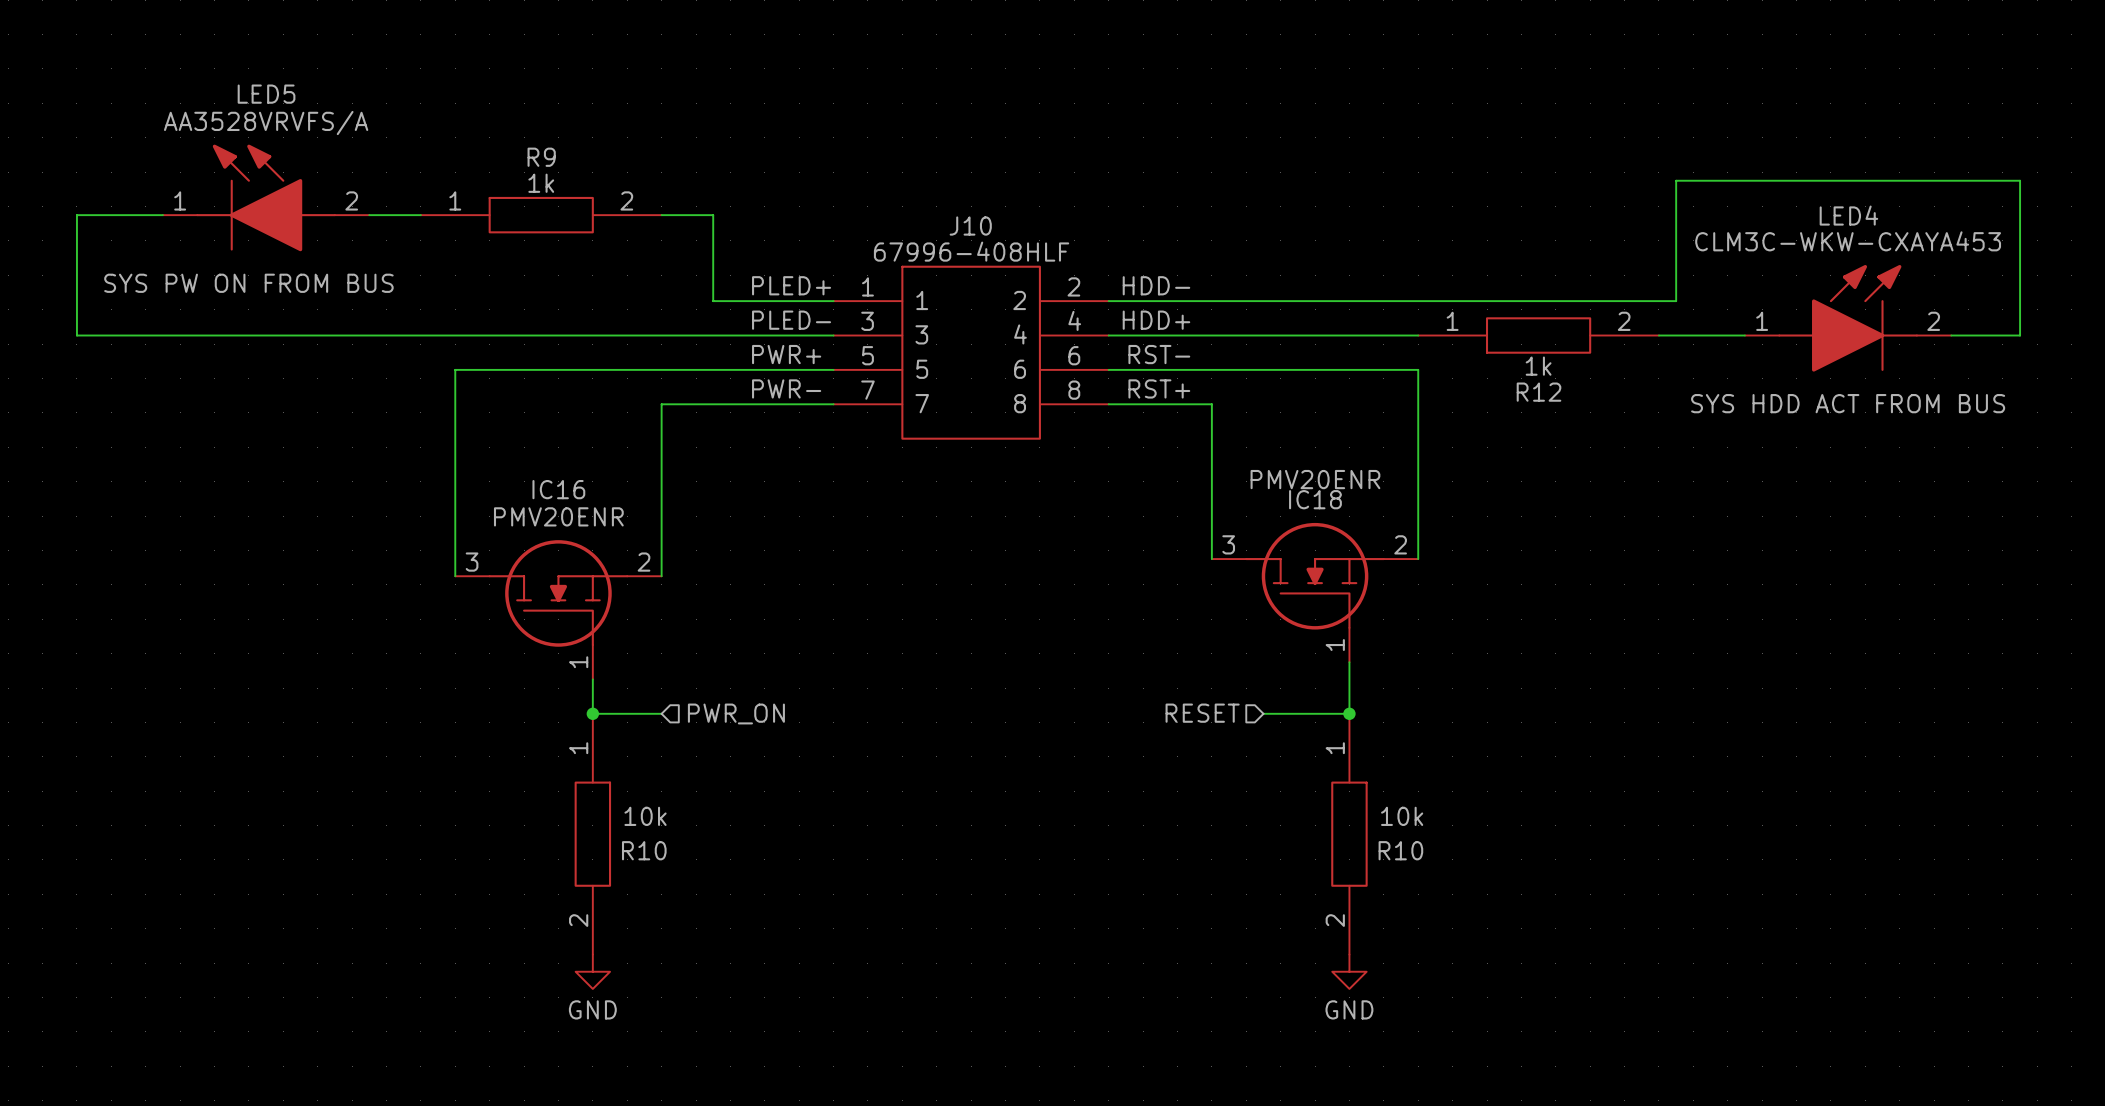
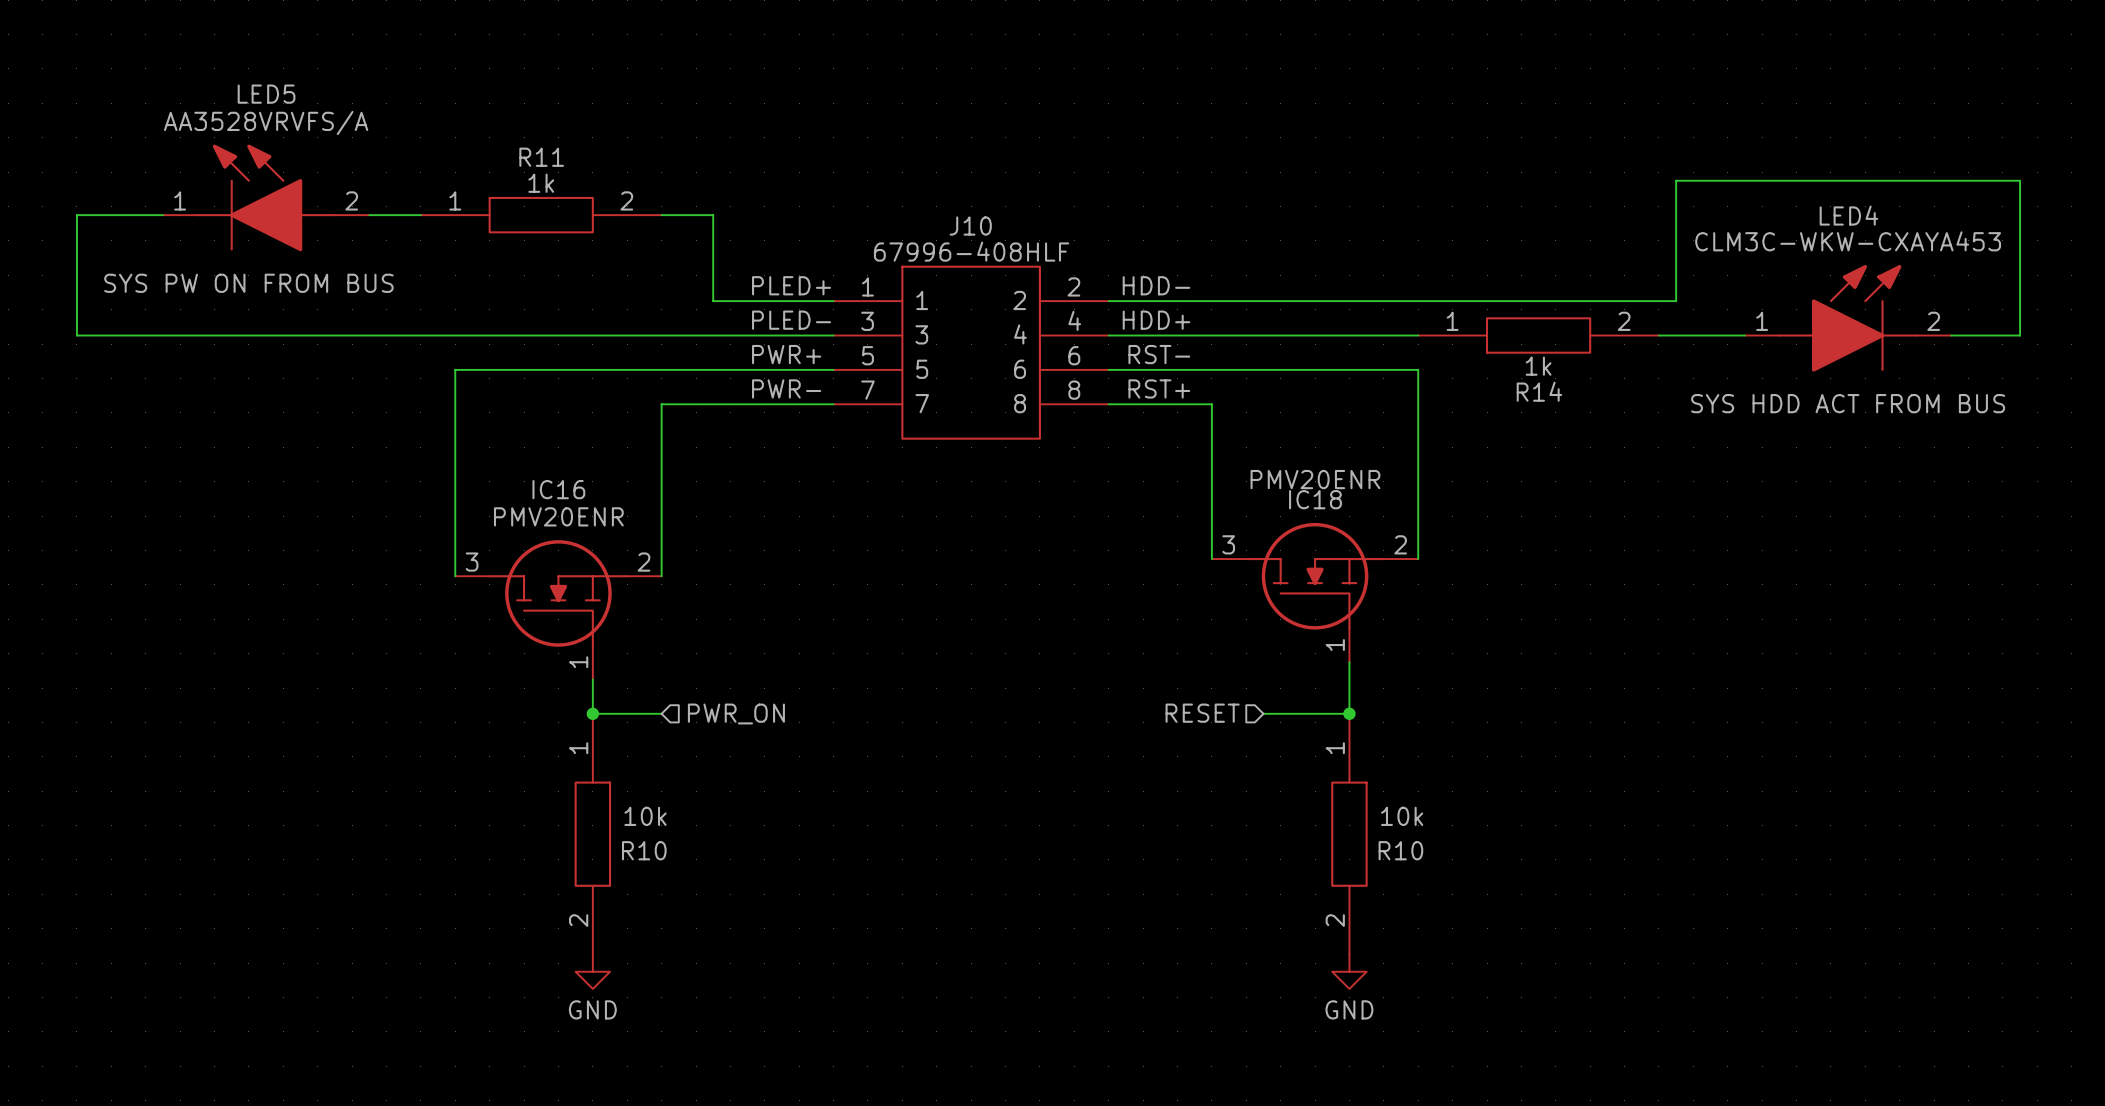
R9 name: R9 (541, 157) -> R11 (541, 157)
R12 name: R12 (1539, 392) -> R14 (1539, 391)

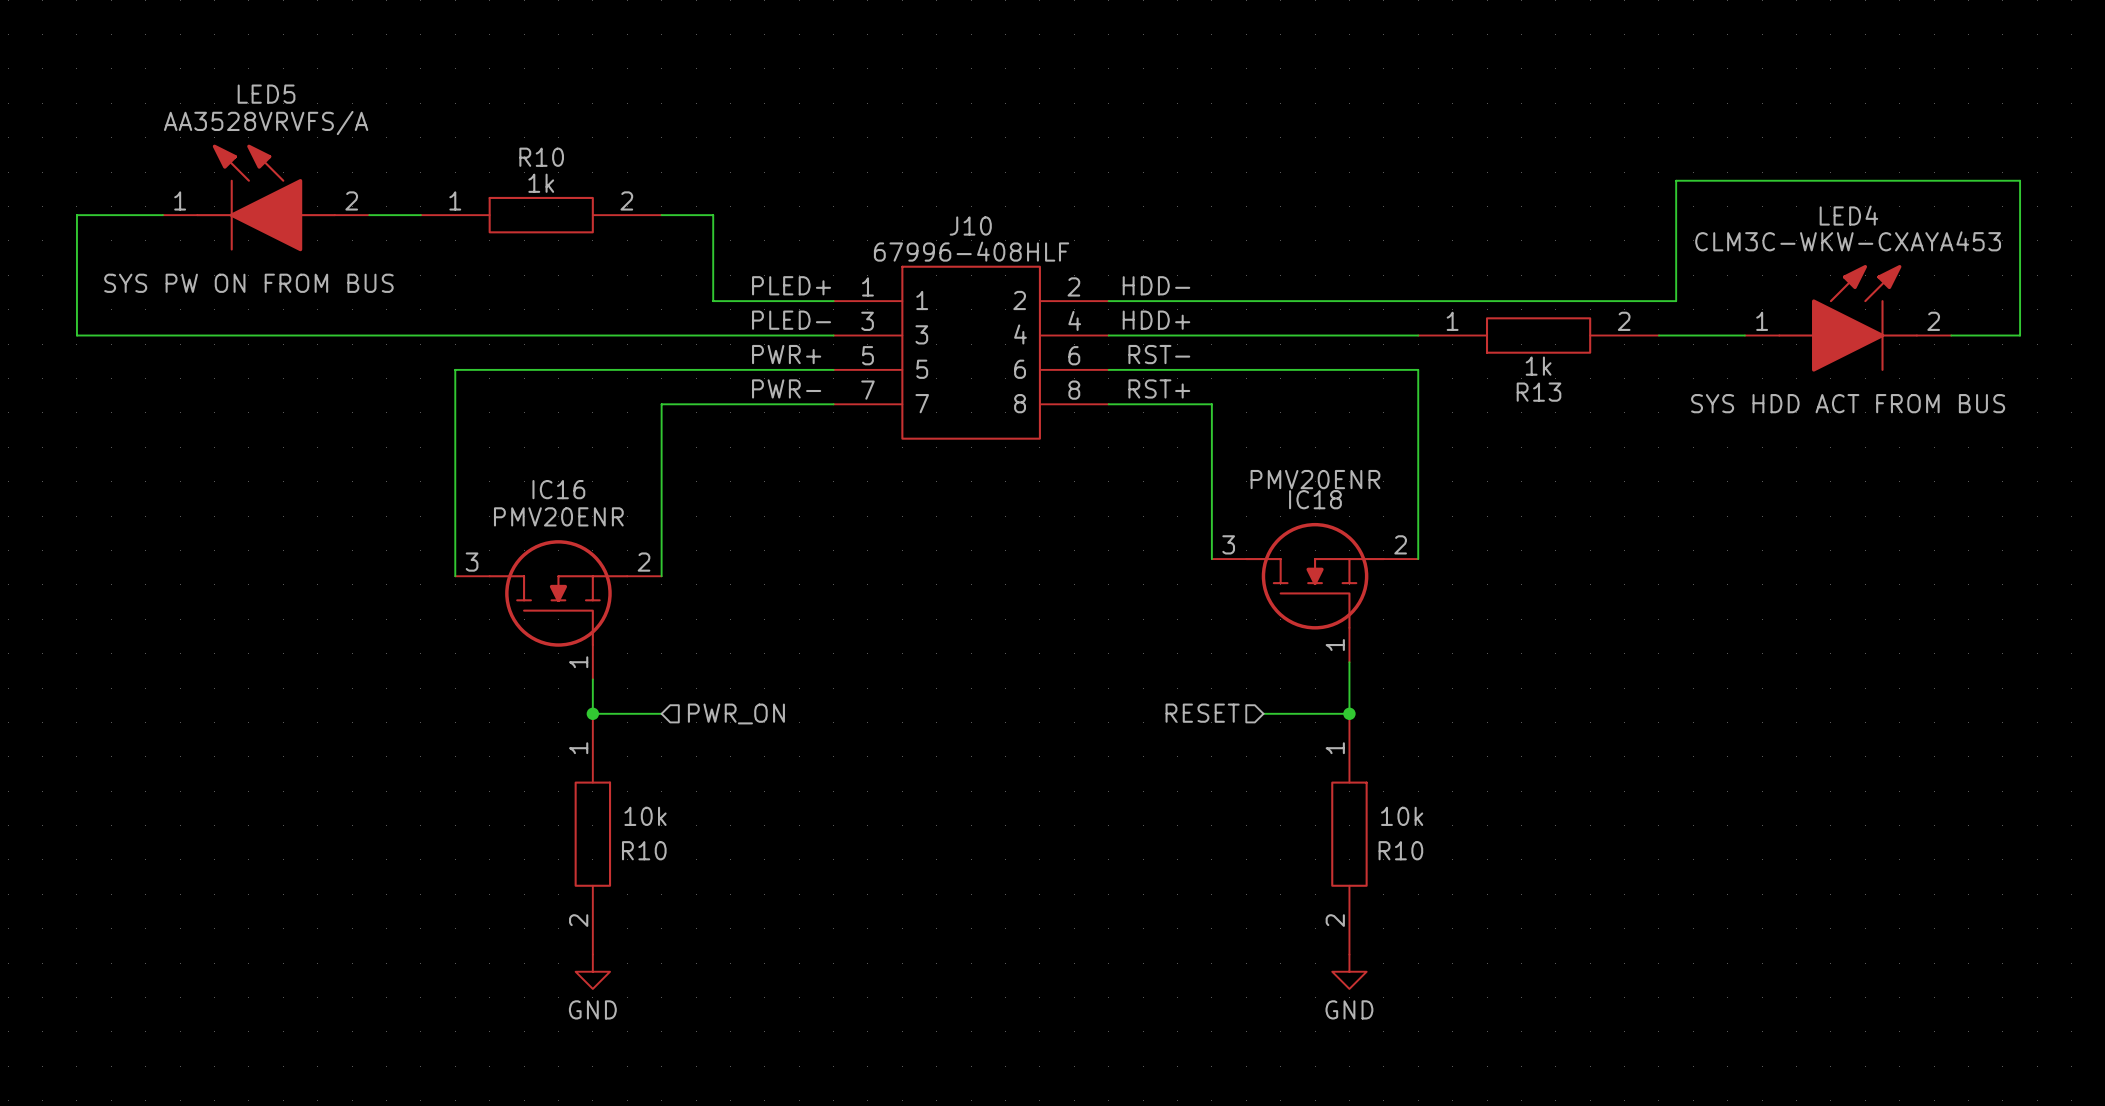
R11 name: R11 (541, 157) -> R10 (541, 157)
R14 name: R14 (1539, 391) -> R13 (1539, 392)

